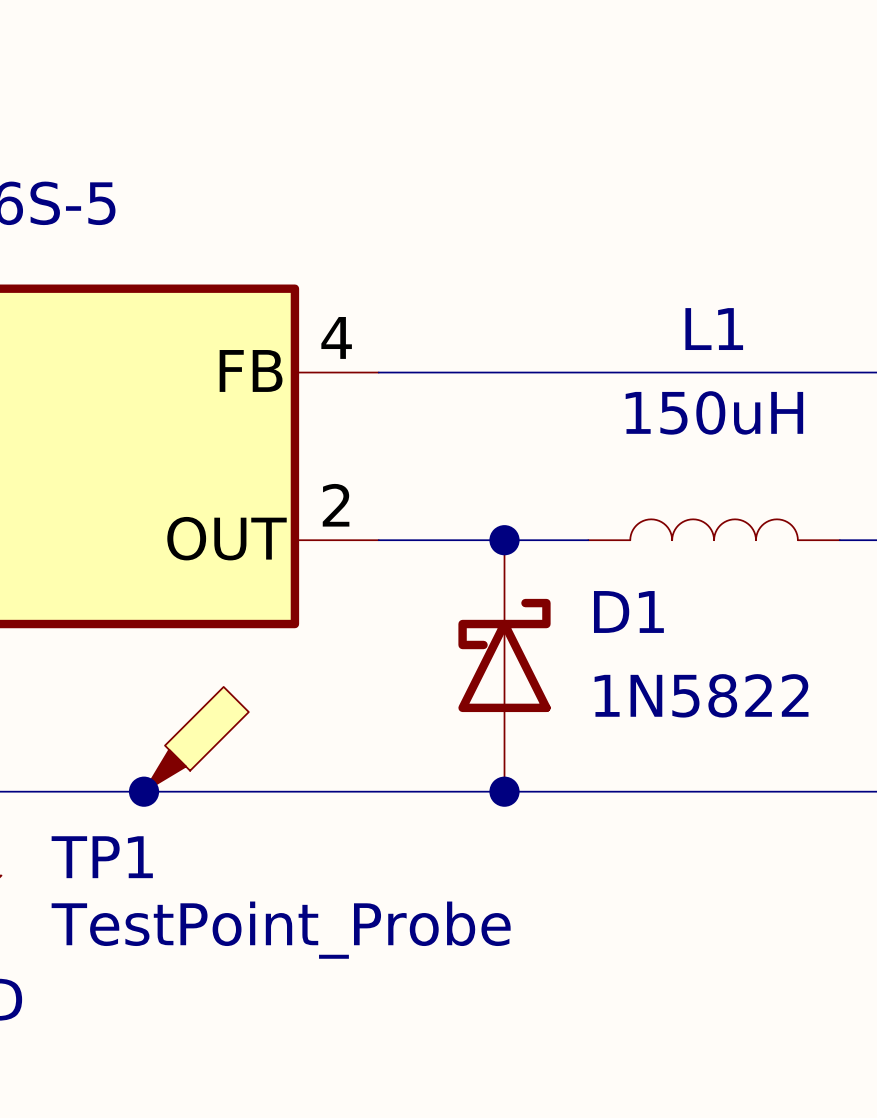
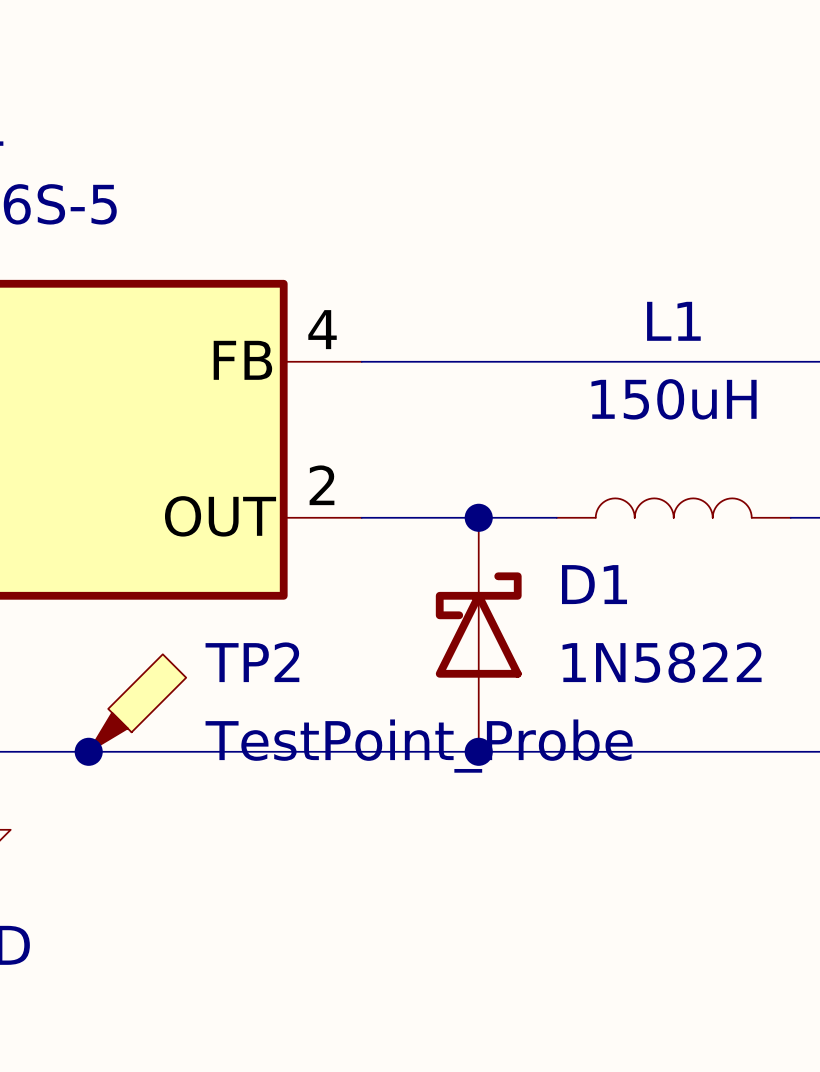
TP2: none -> TestPoint_Probe (137, 703)
TP1: TestPoint_Probe (196, 739) -> none
junction position: (144, 791) -> (88, 751)

